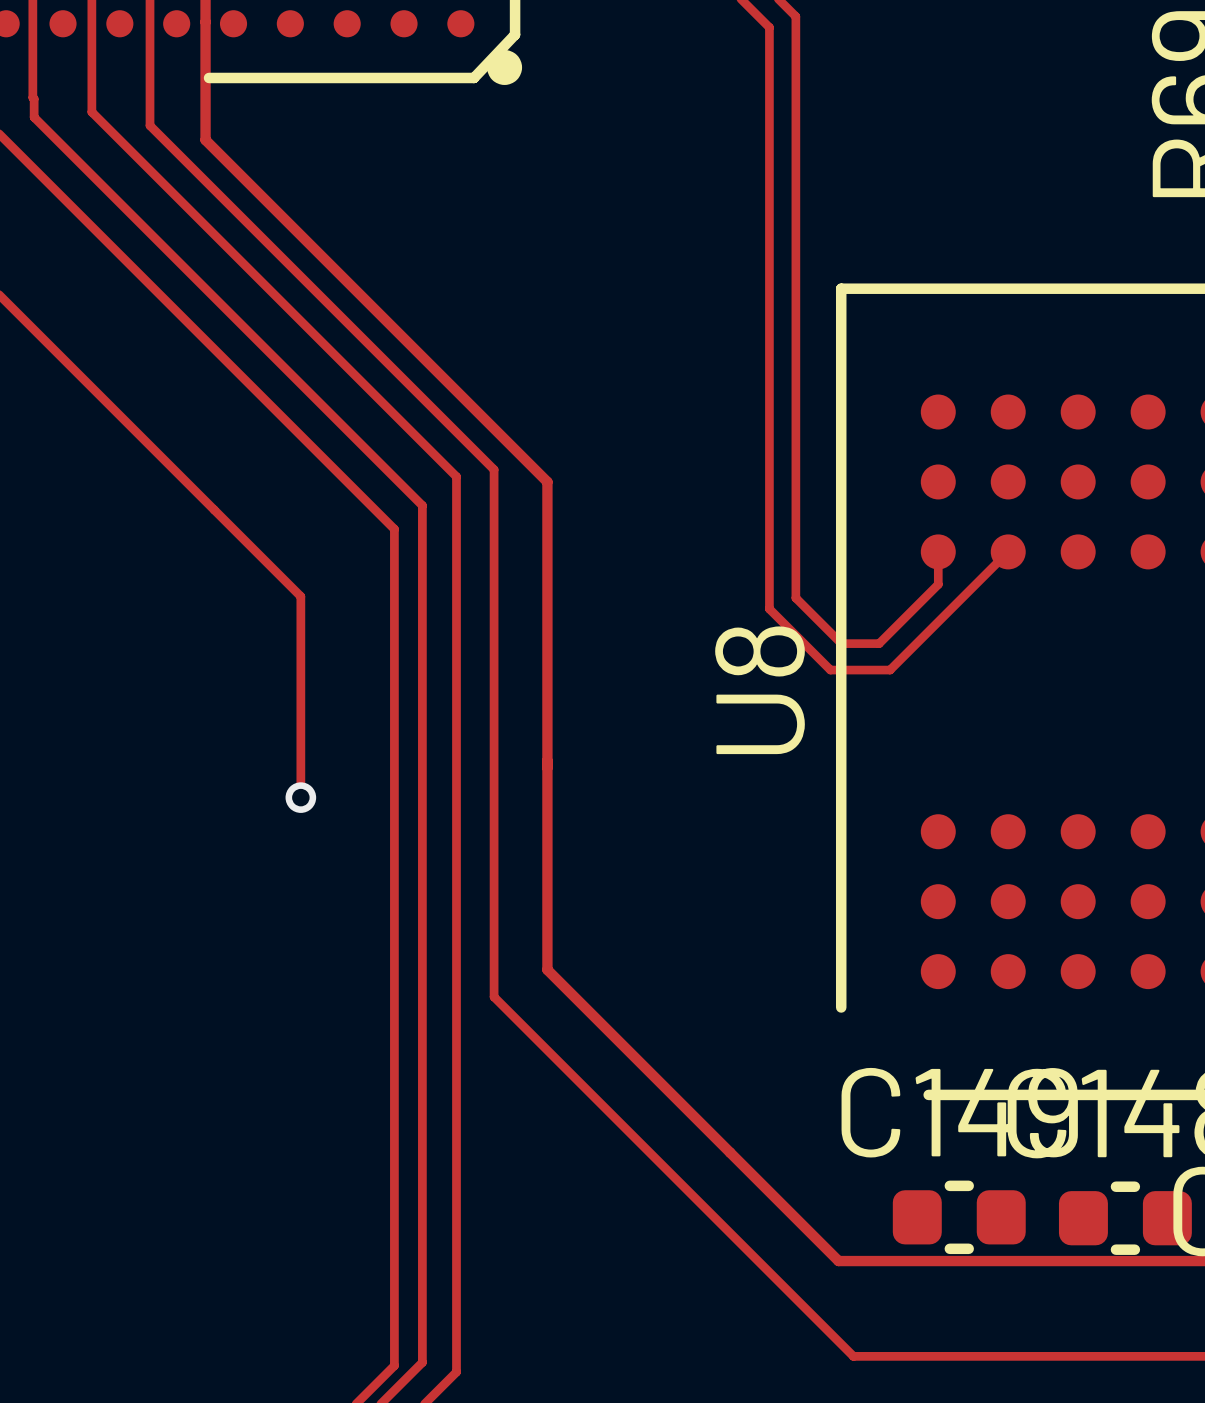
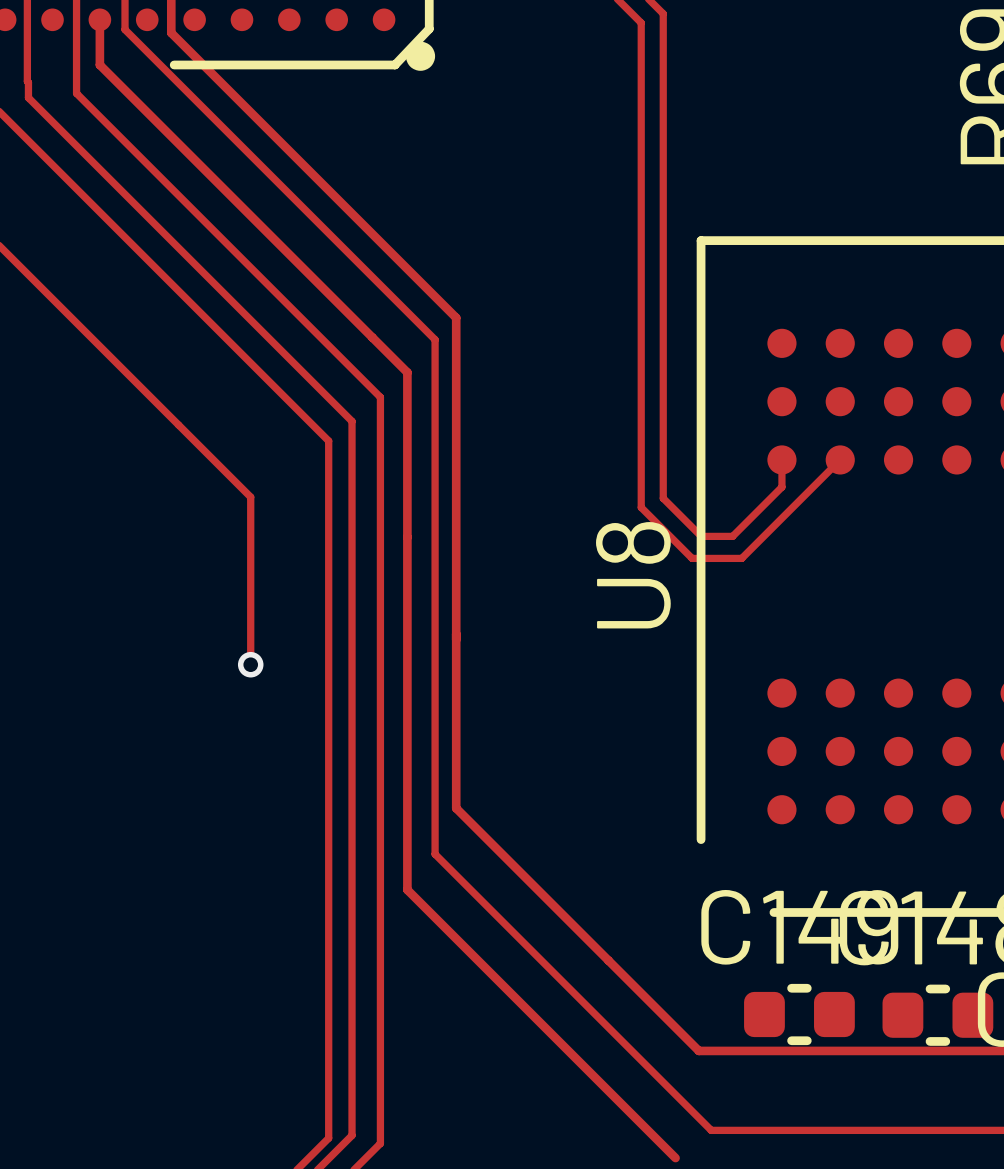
track: none -> (99, 19) (99, 64) (407, 372) (407, 889) (675, 1158)
track: (150, 35) (150, 125) (494, 469) (494, 996) (522, 1024) -> (125, 29) (435, 339) (435, 854)
track: (205, 39) (205, 140) (547, 481) -> (171, 32) (456, 317) (456, 401)

